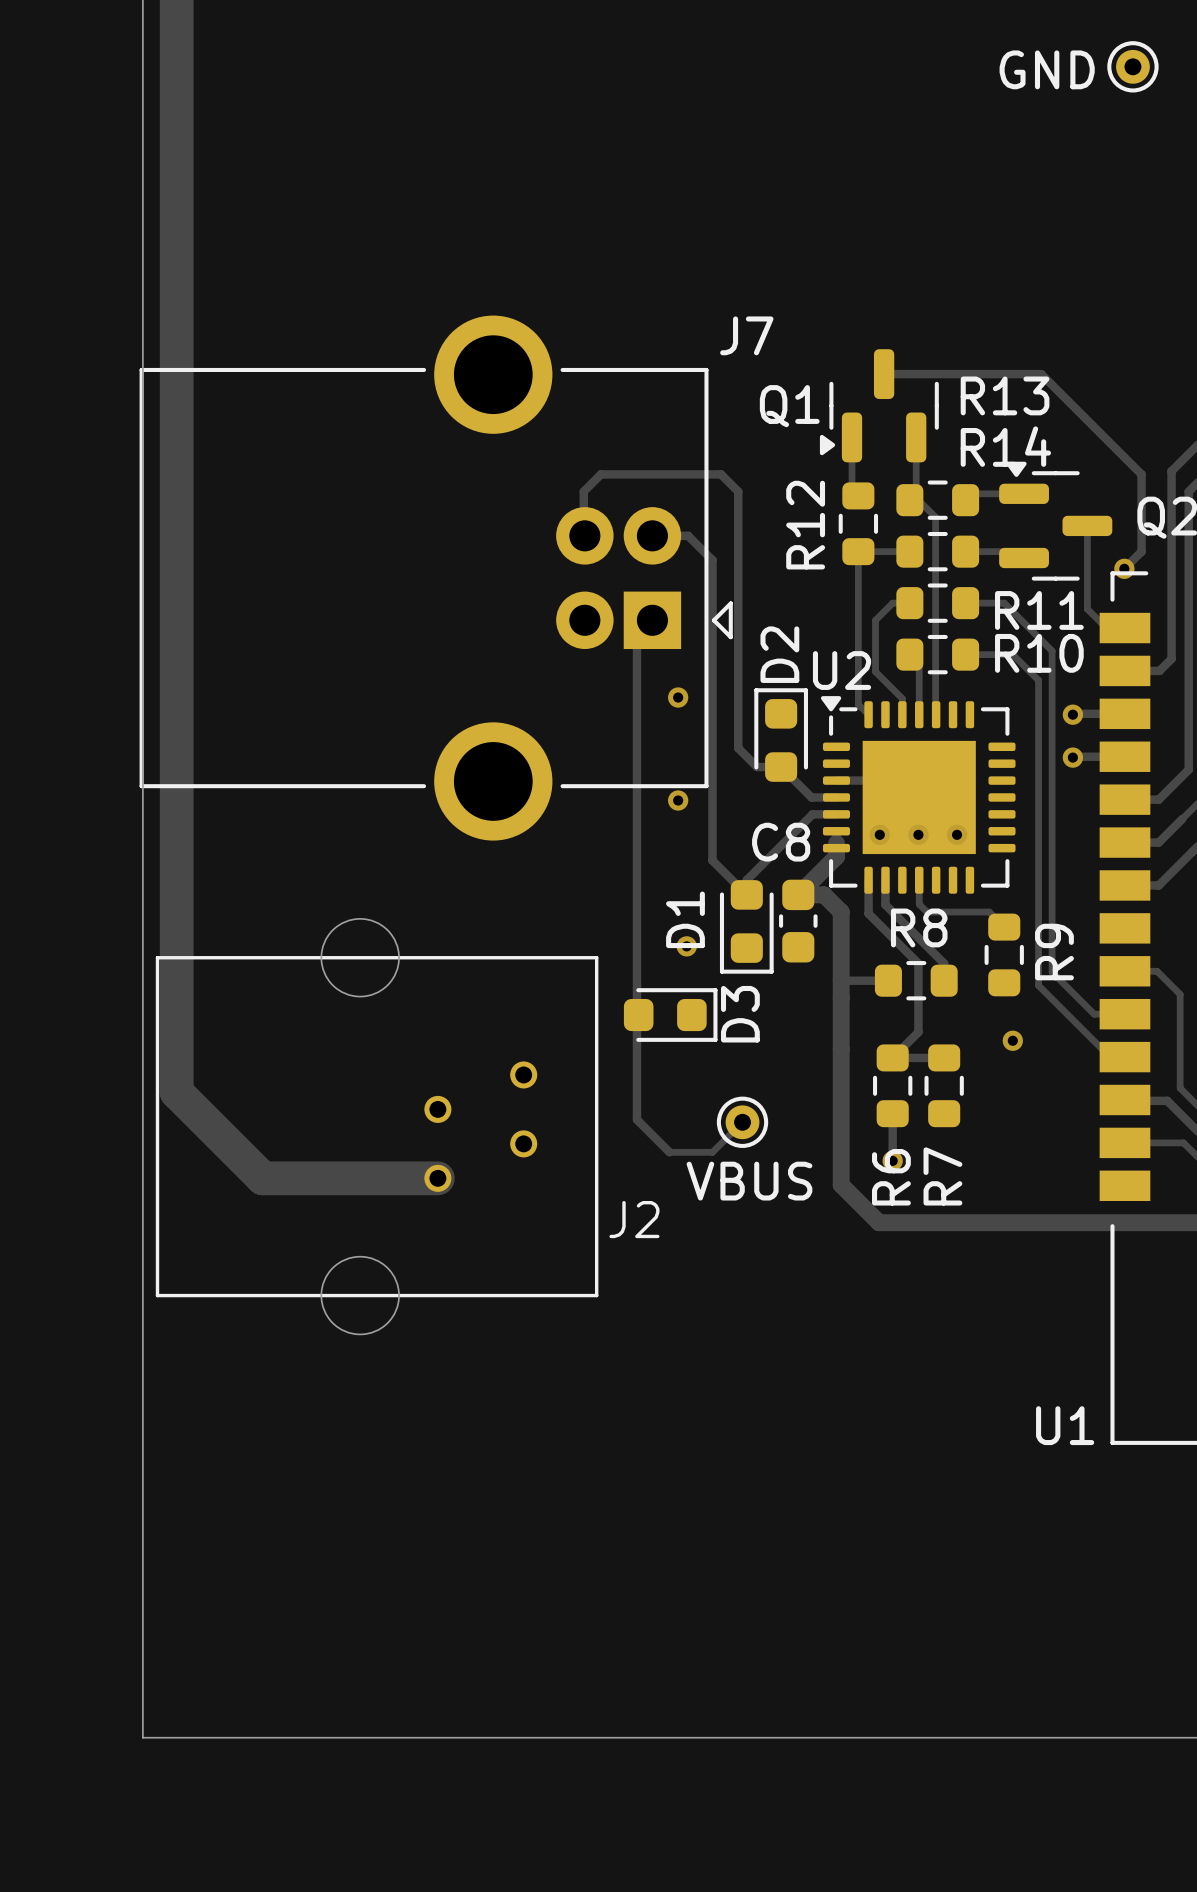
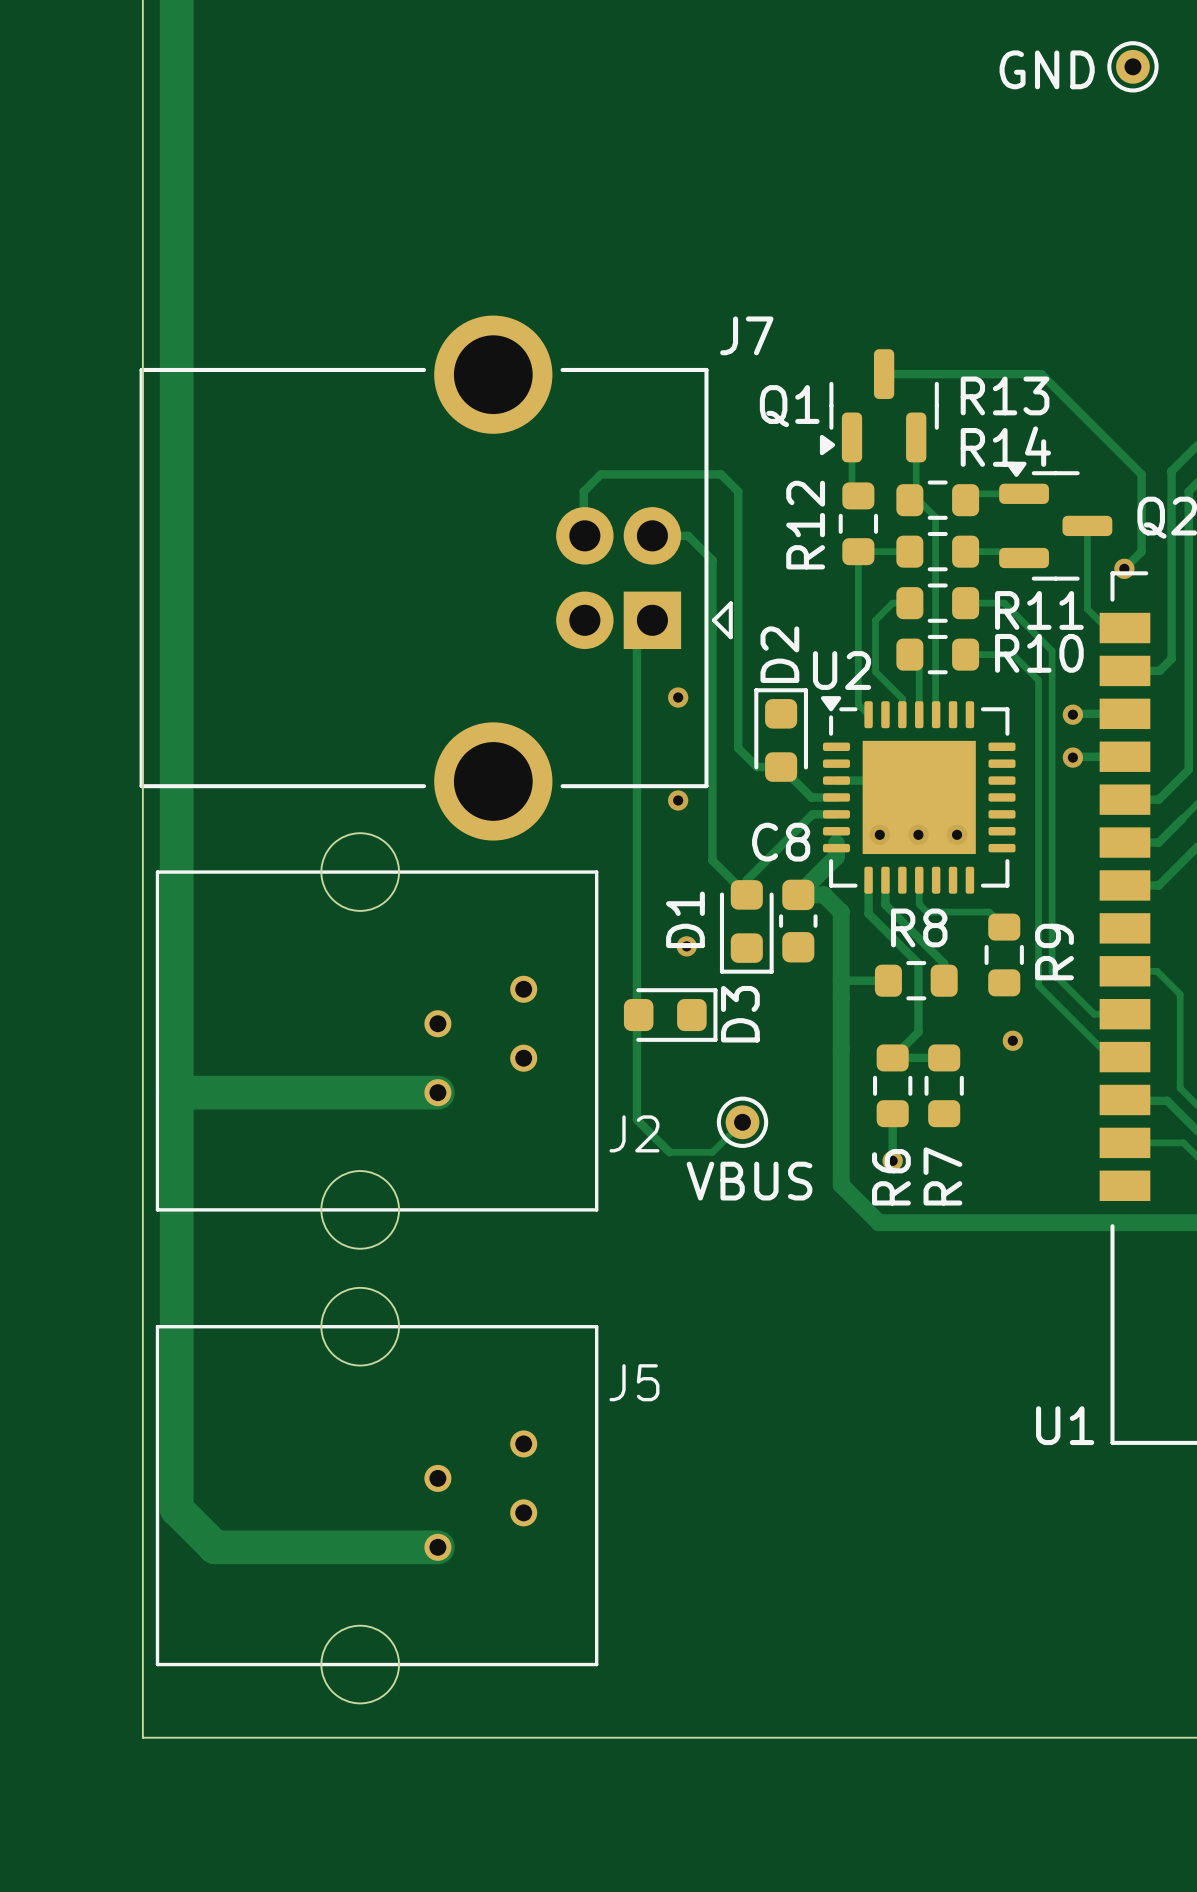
track: none -> (176, 1092) (176, 1508) (215, 1547) (437, 1547)
track: (177, 1092) (262, 1178) (437, 1178) -> (177, 1092) (437, 1092)
J2 position: (377, 1126) -> (377, 1040)
J5: none -> (377, 1495)

